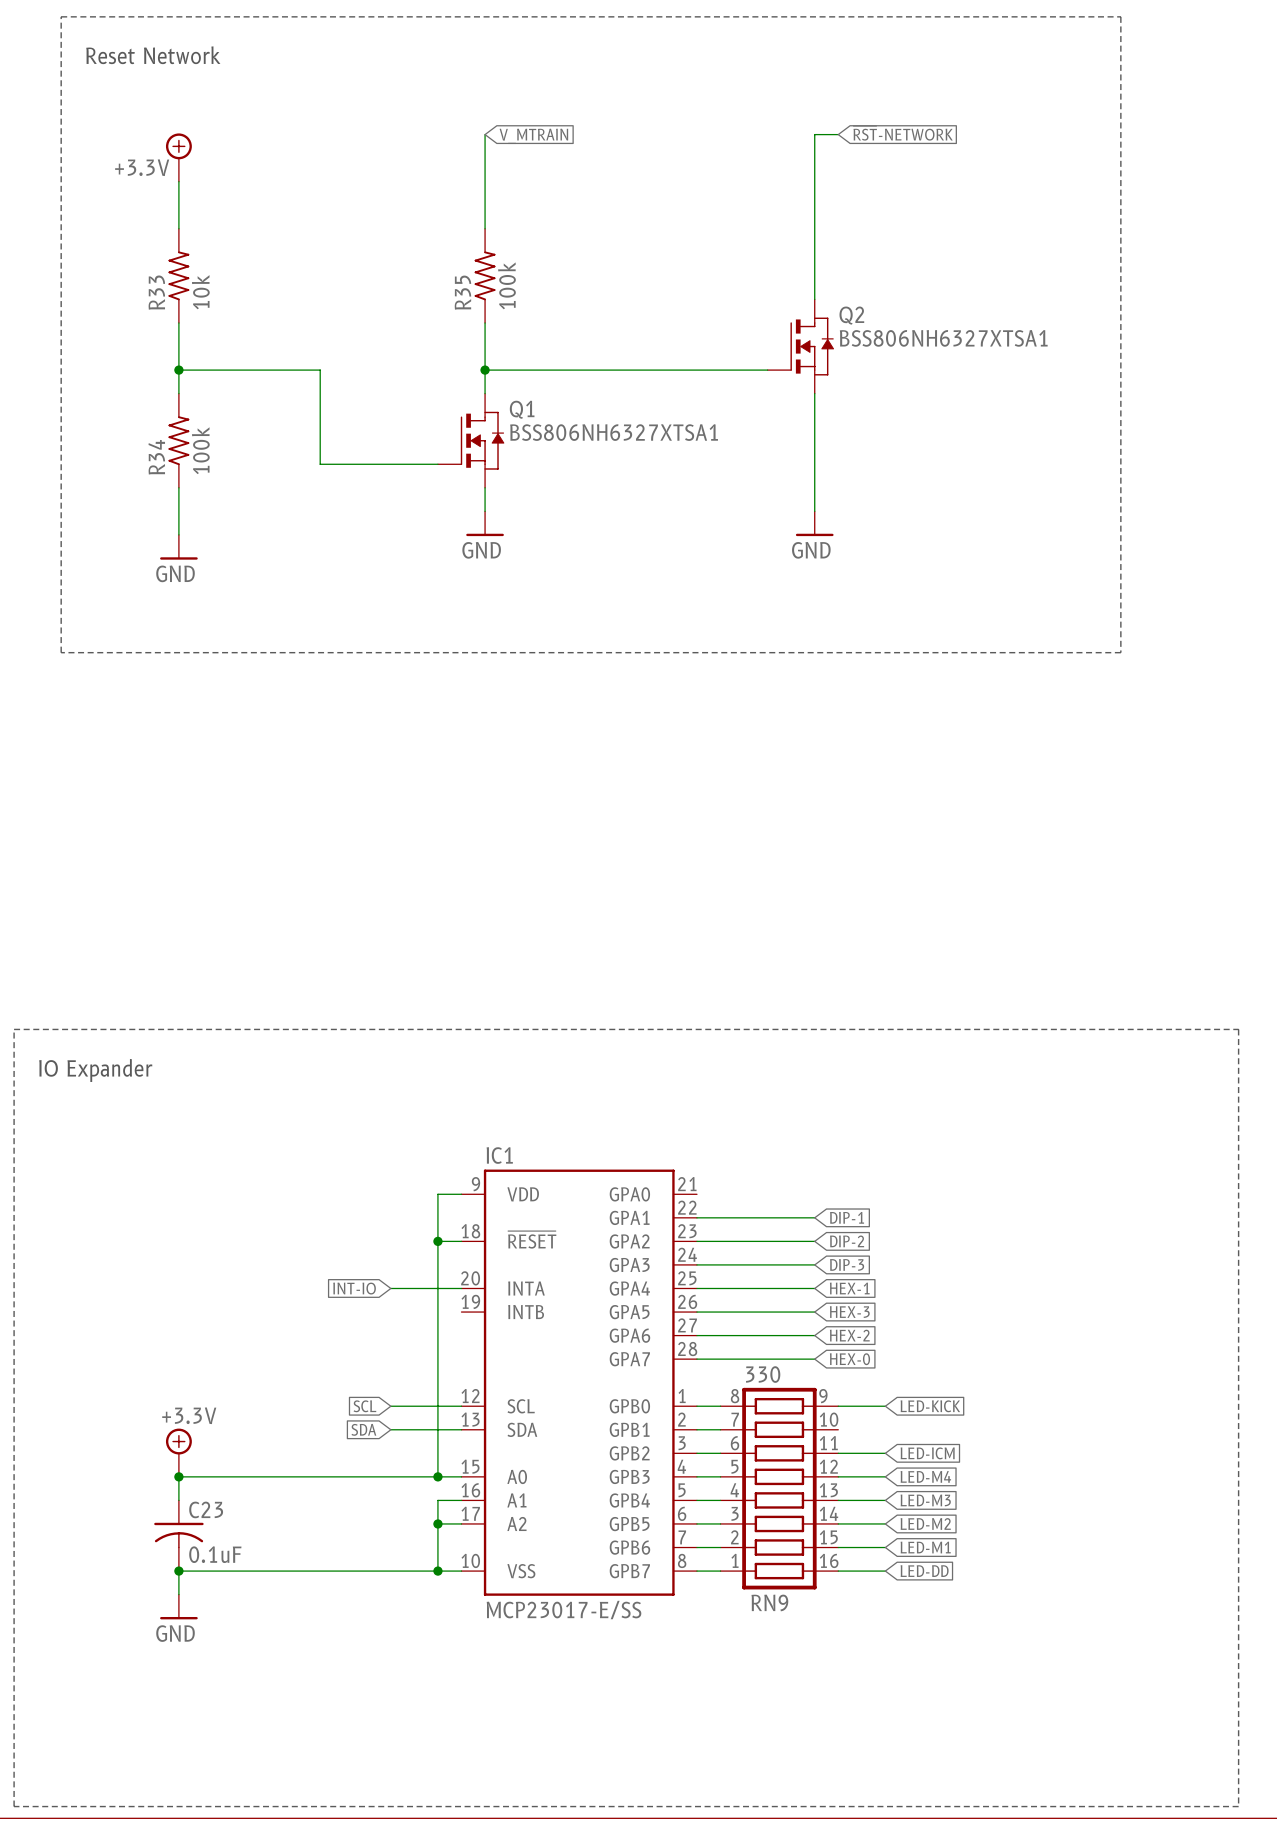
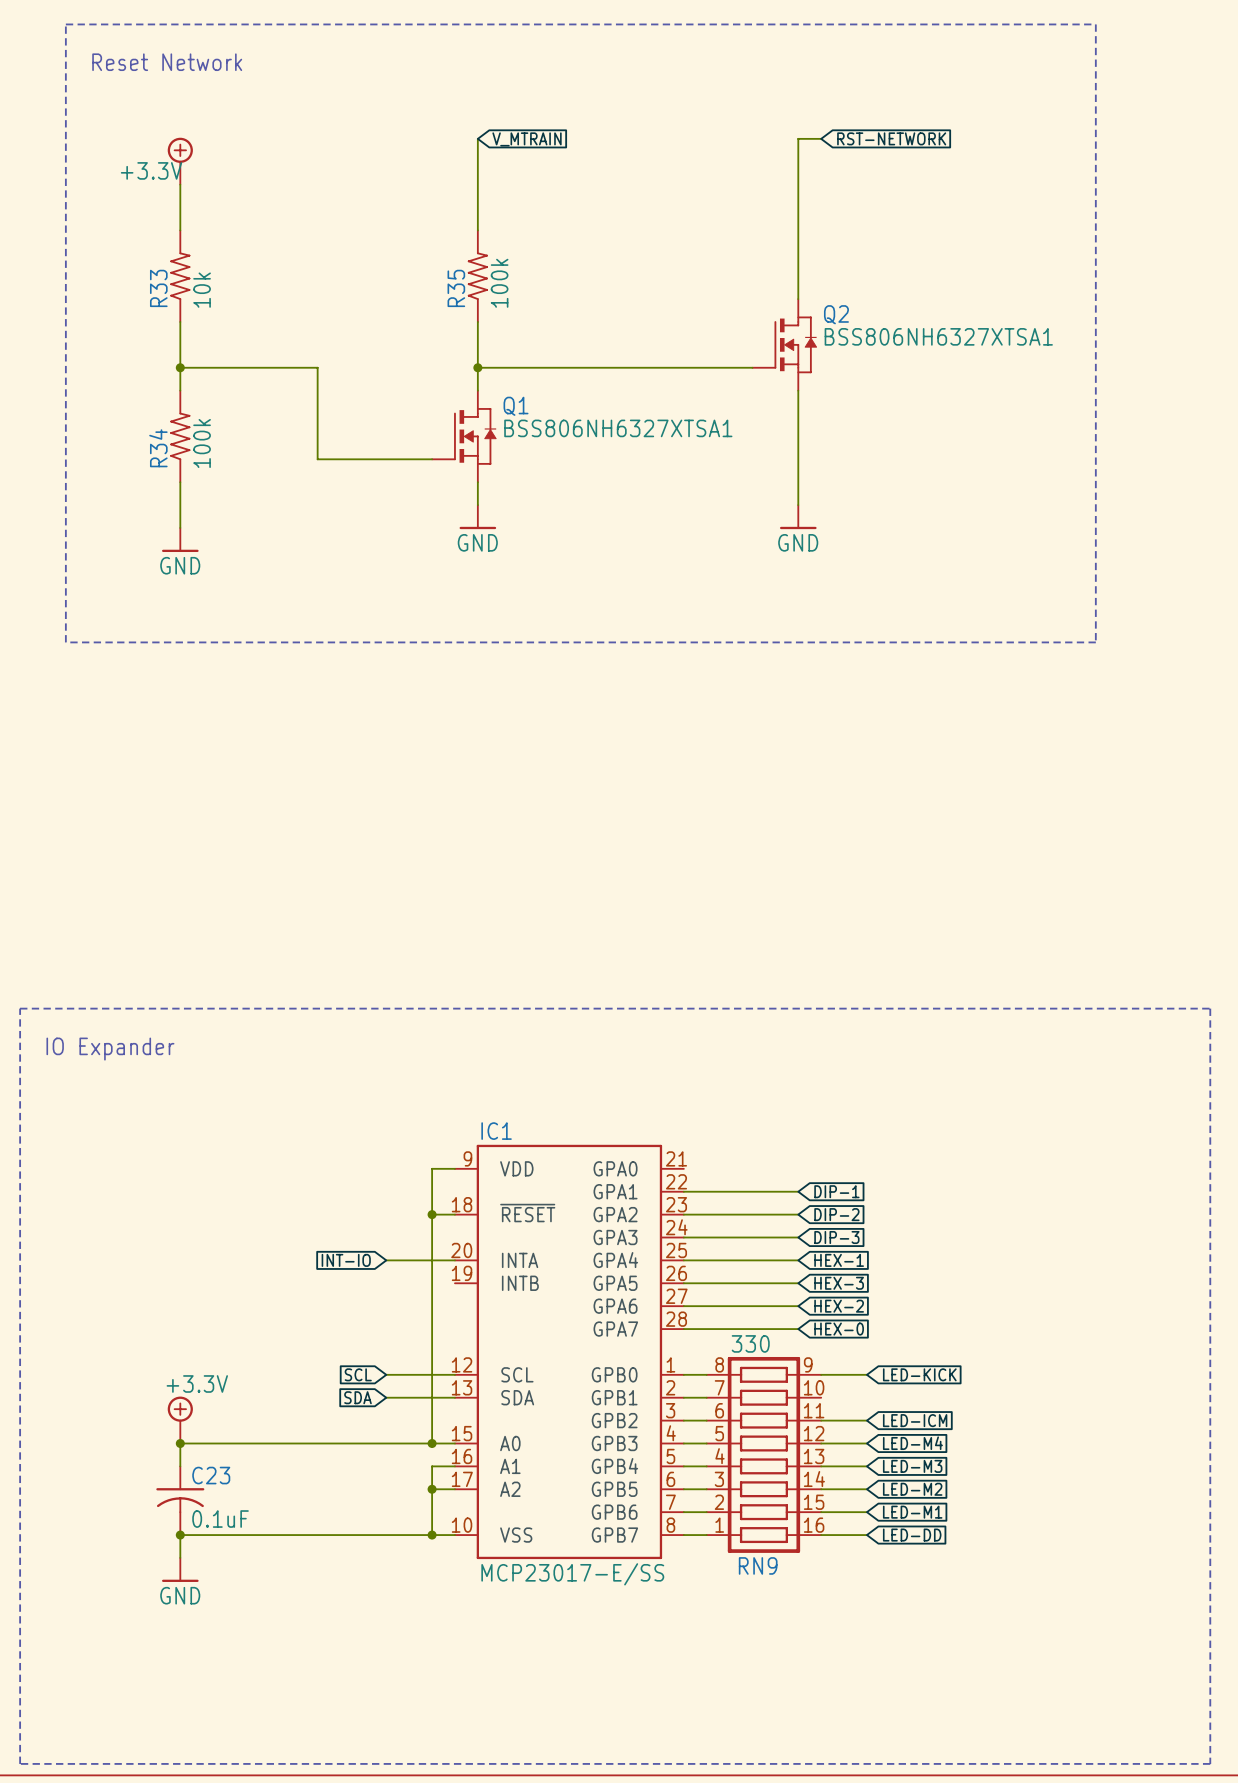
global label: ~{RST}-NETWORK (903, 133) -> RST-NETWORK (891, 138)

